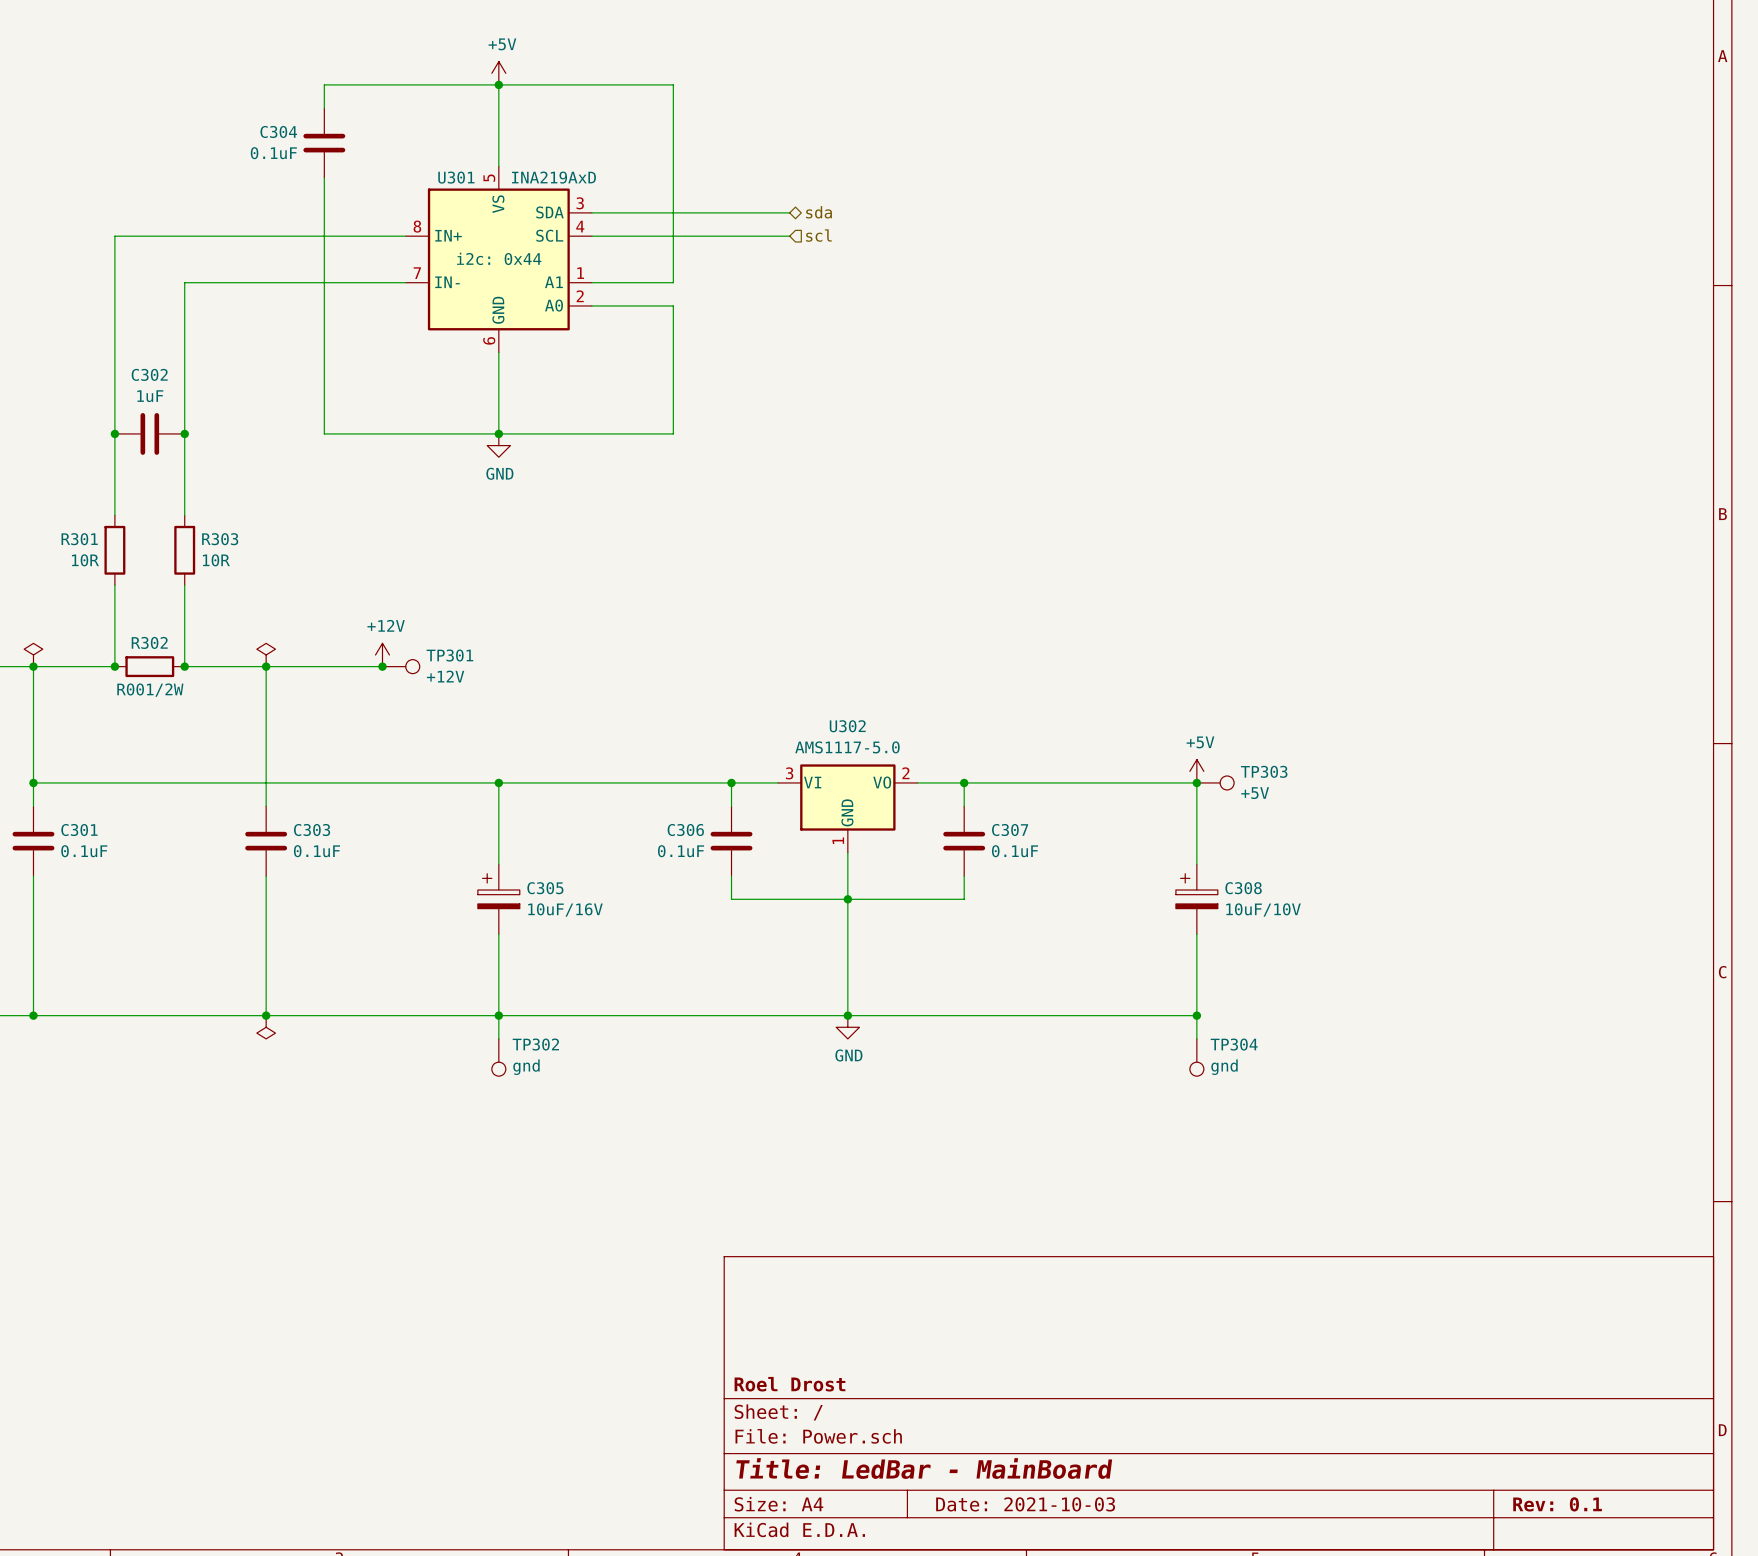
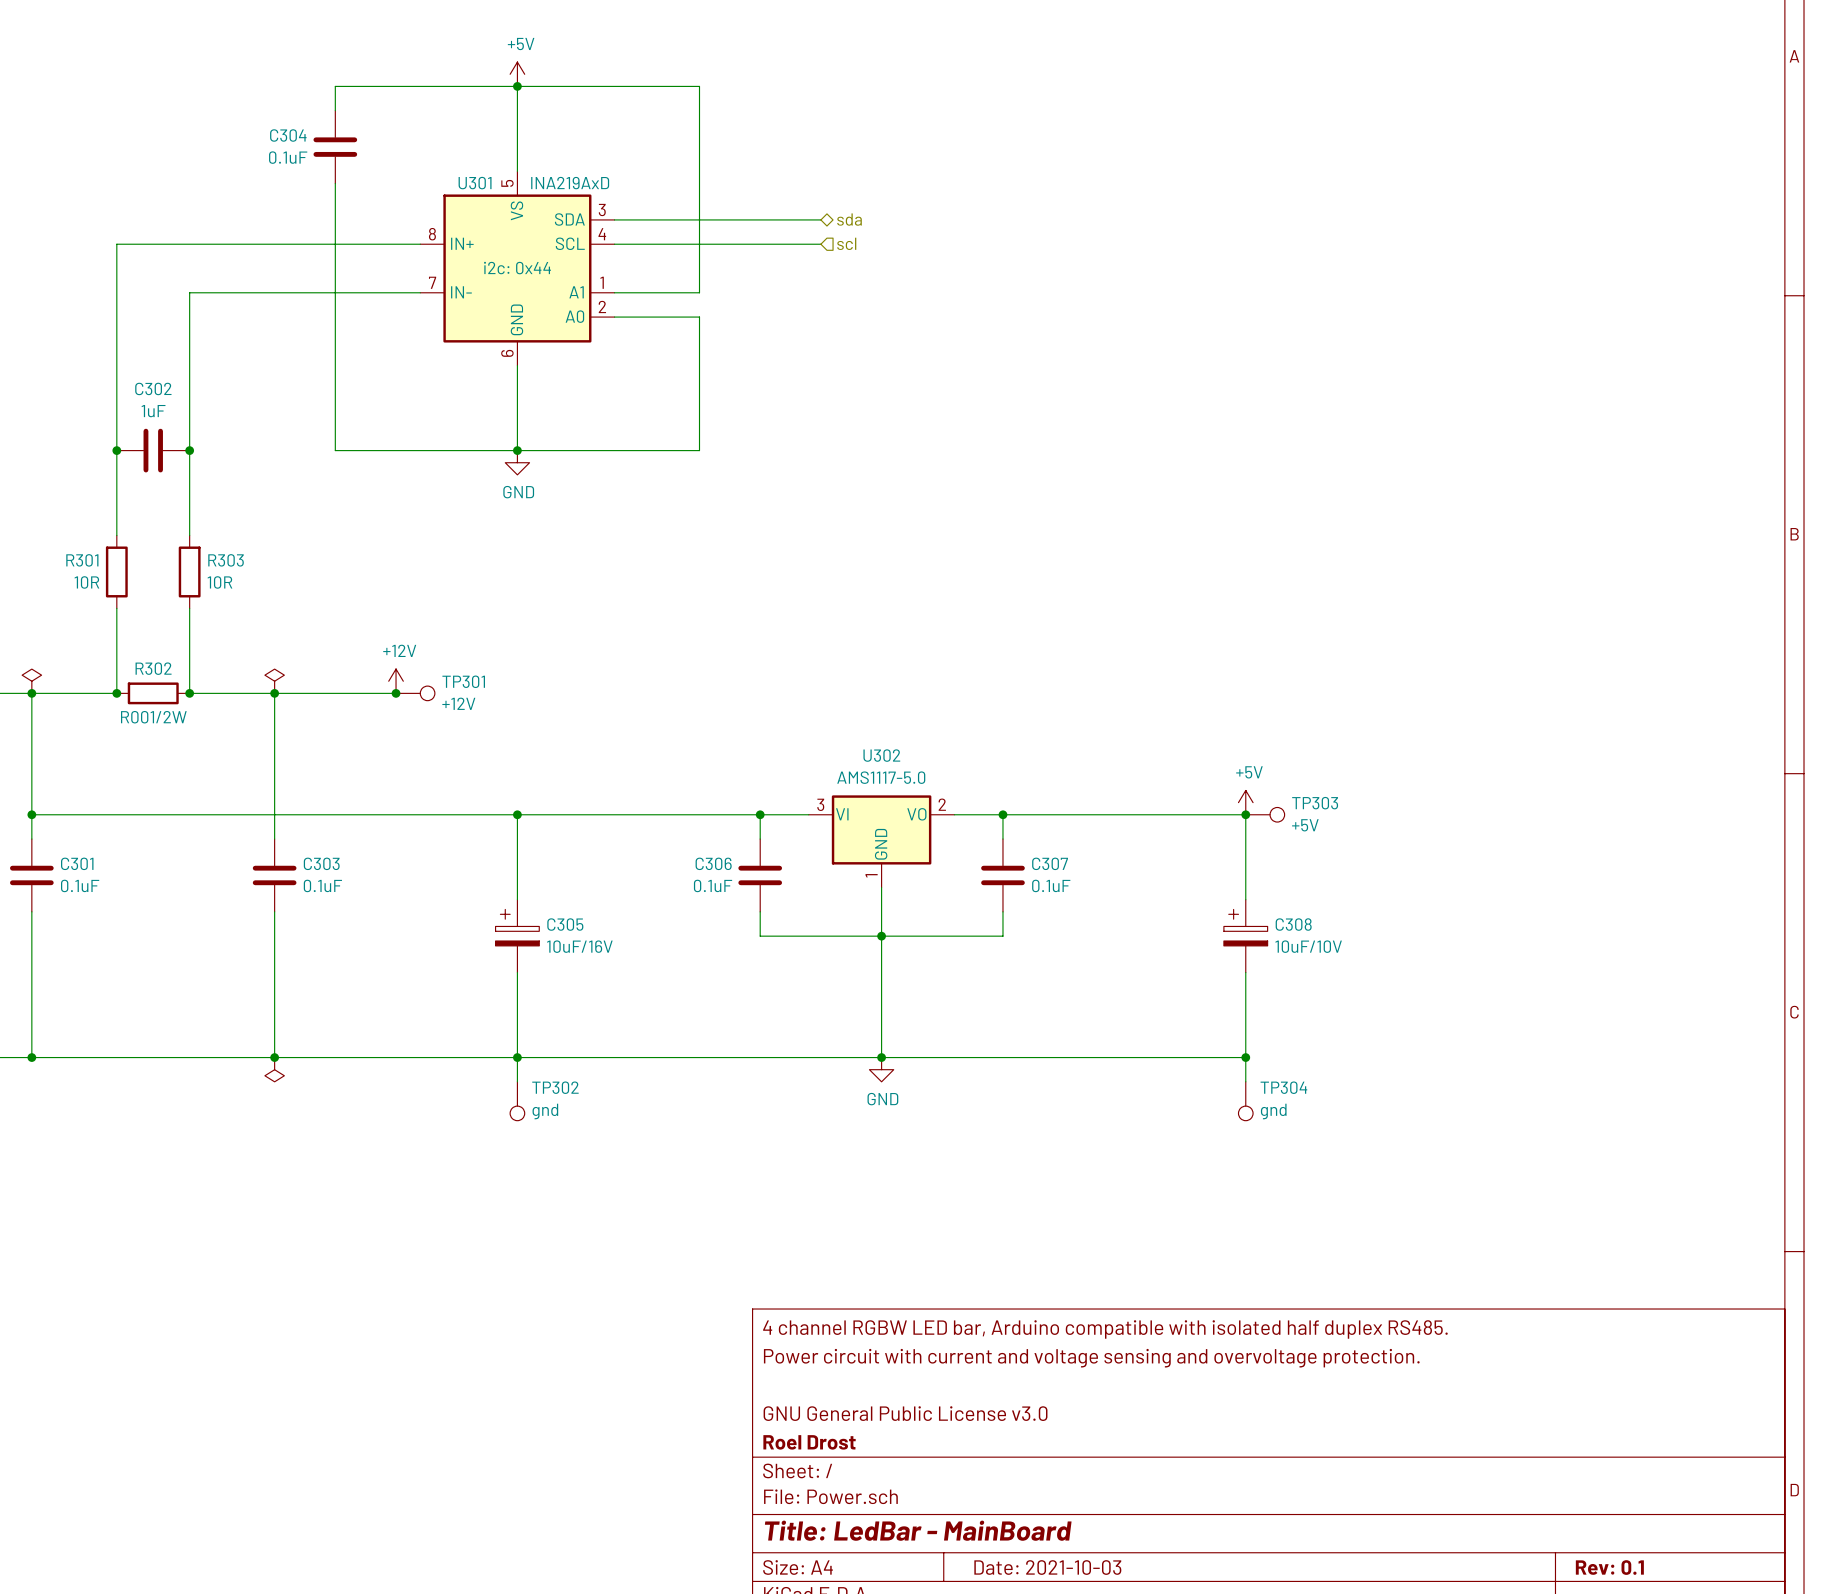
title block: none -> 4 channel RGBW LED bar, Arduino compatible with isolated half duplex RS485. (1105, 1329)
title block: none -> Power circuit with current and voltage sensing and overvoltage protection. (1091, 1358)
title block: none -> GNU General Public License v3.0 (905, 1413)

